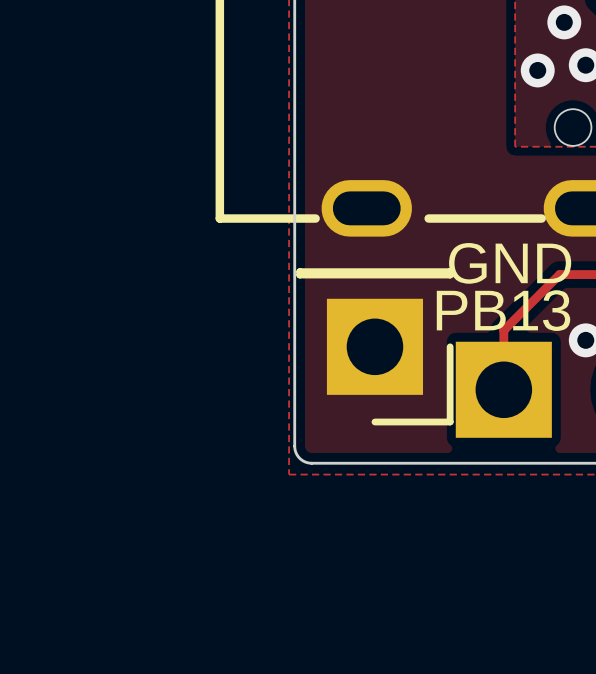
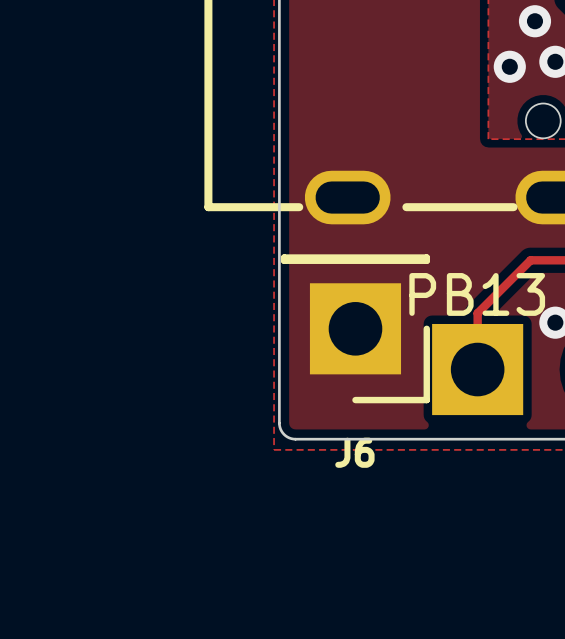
text: GND (510, 263) -> none
J6 name: none -> J6 (354, 452)

